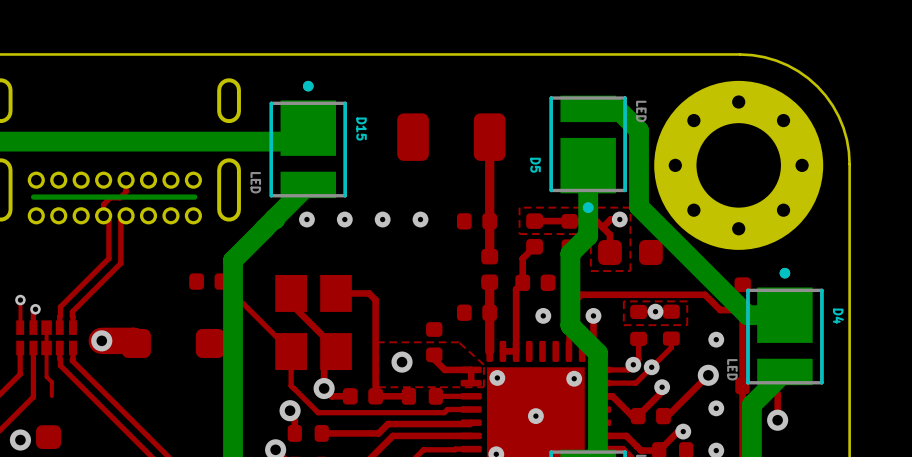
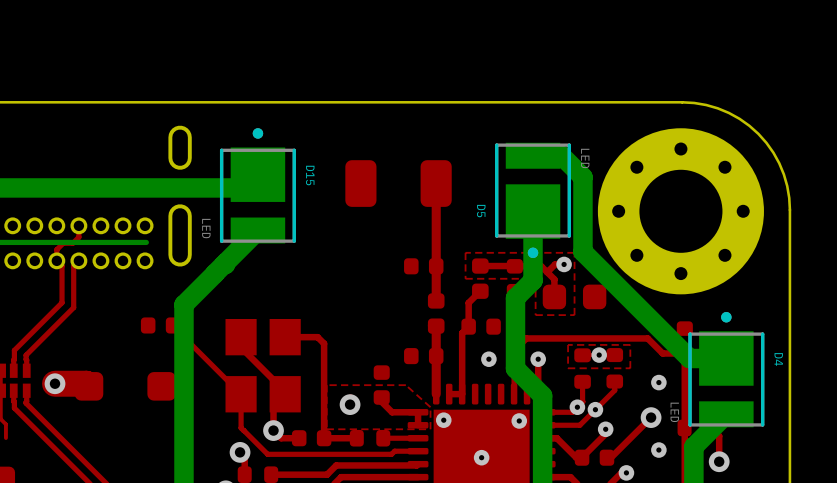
via: (306, 219) -> none
via: (344, 219) -> none
via: (382, 219) -> none
via: (420, 219) -> none

